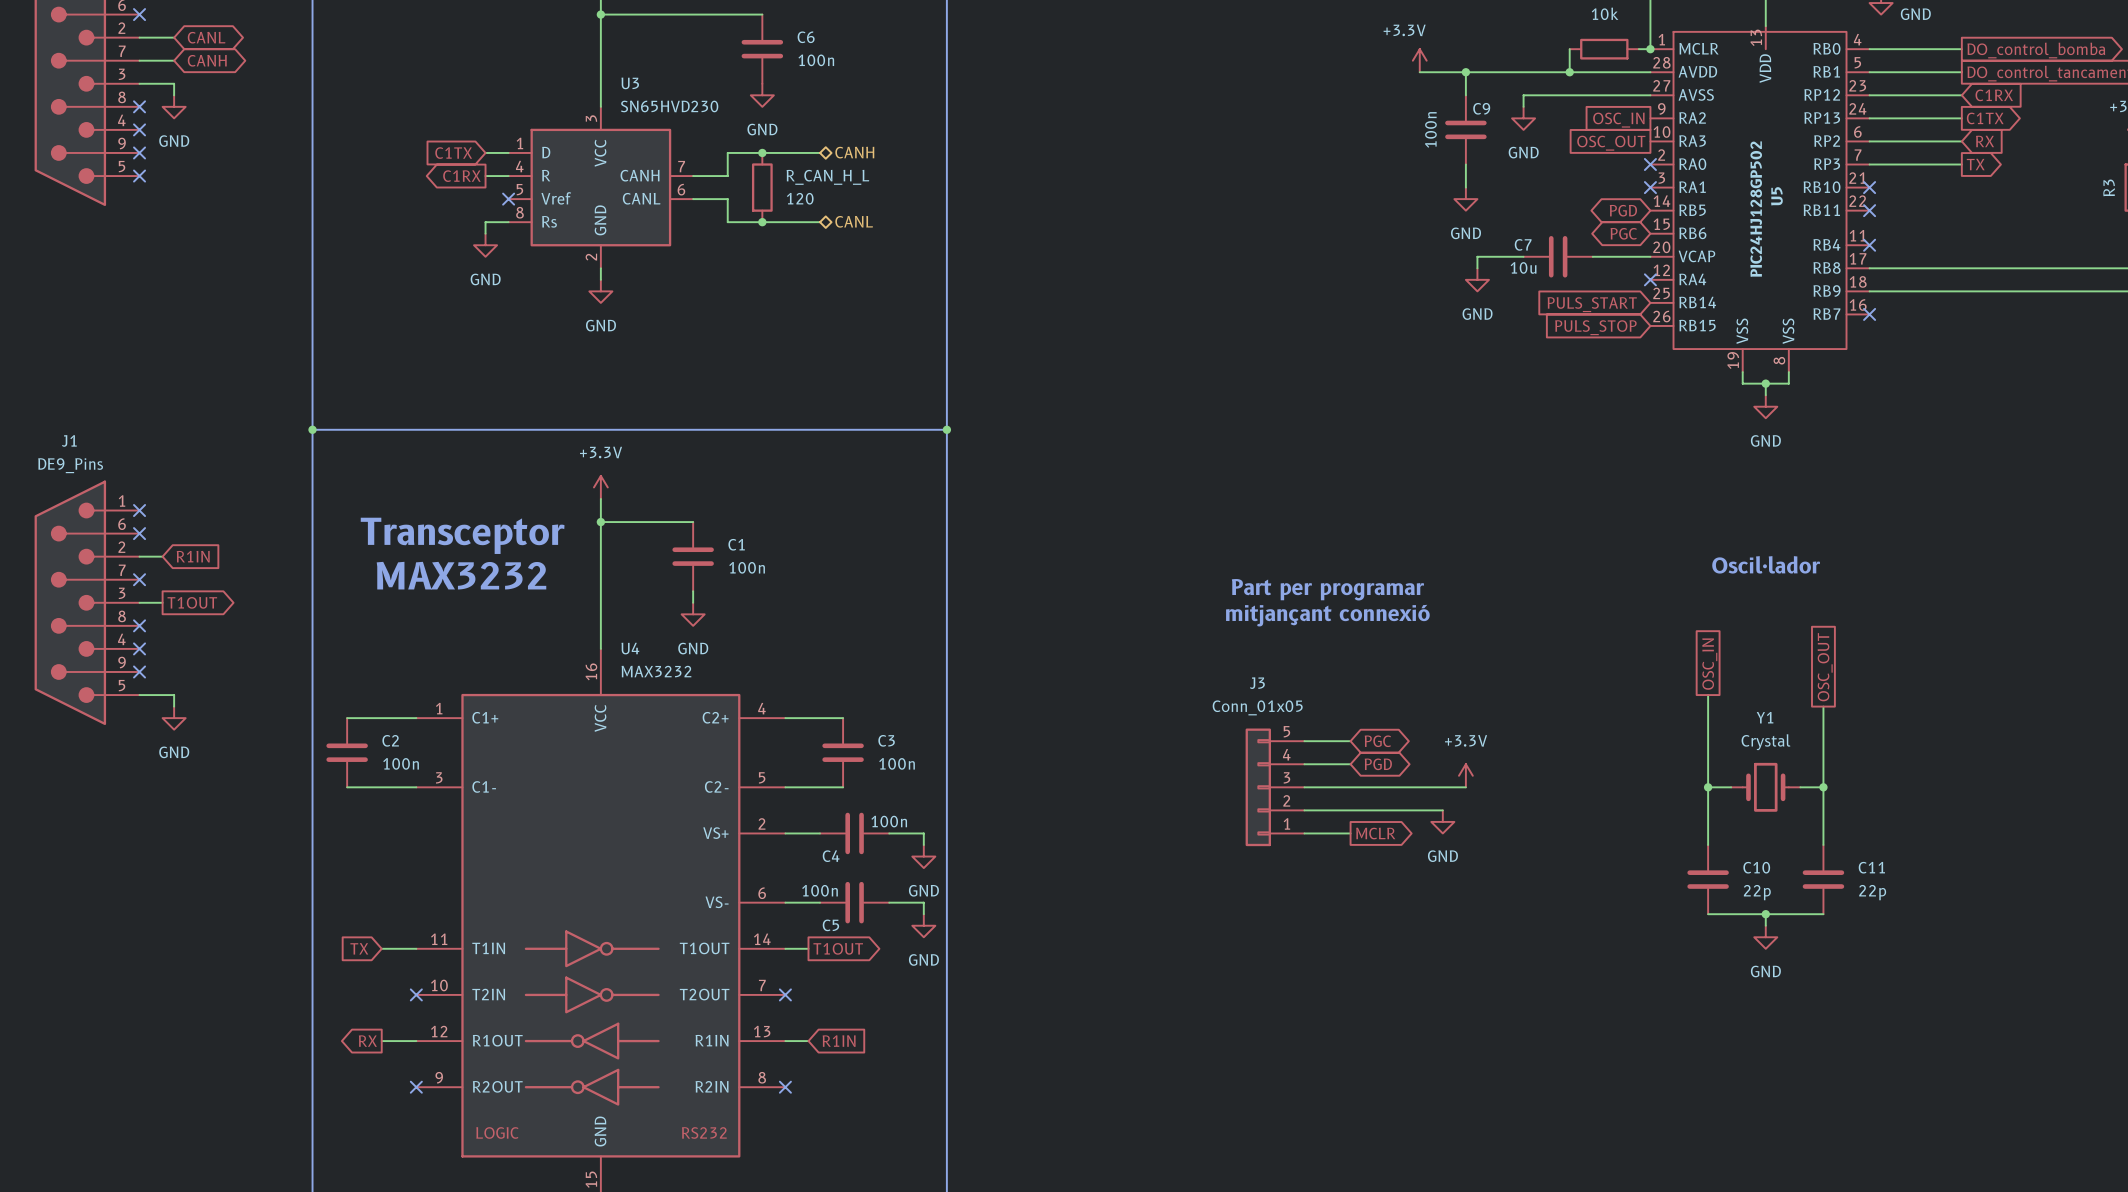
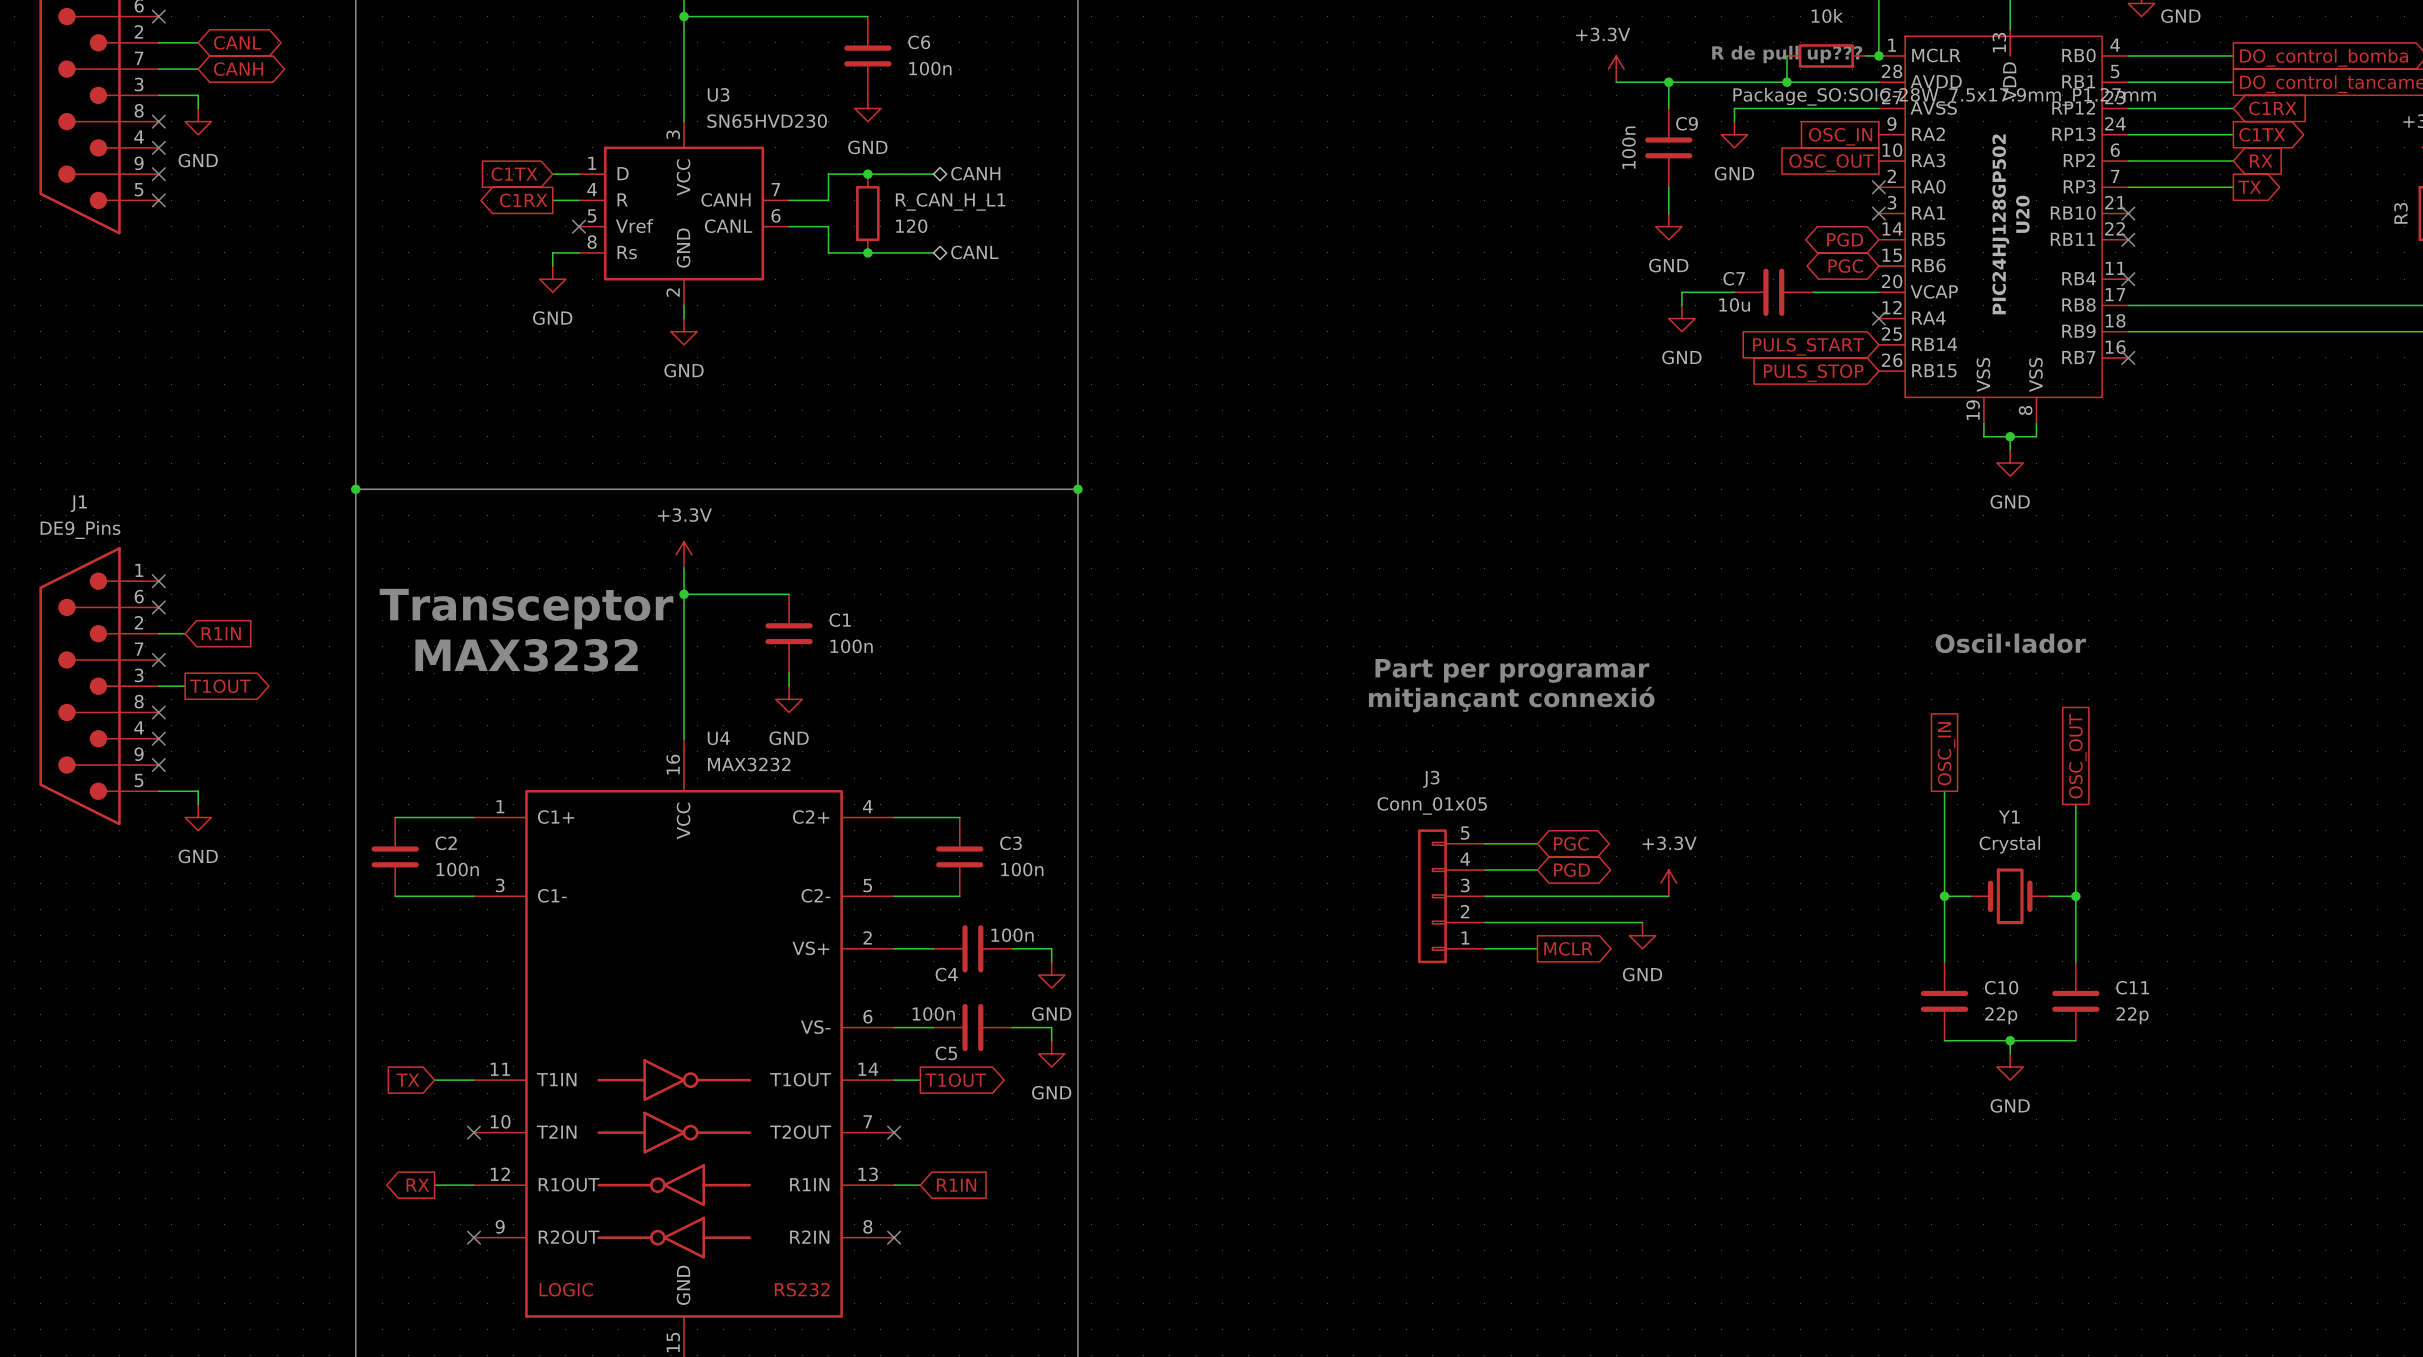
text: none -> R de pull up??? (1787, 54)
U5 text: none -> Package_SO:SOIC-28W_7.5x17.9mm_P1.27mm (1944, 96)
R_CAN_H_L name: R_CAN_H_L (827, 177) -> R_CAN_H_L1 (950, 201)
U5 name: U5 (1776, 196) -> U20 (2022, 214)

